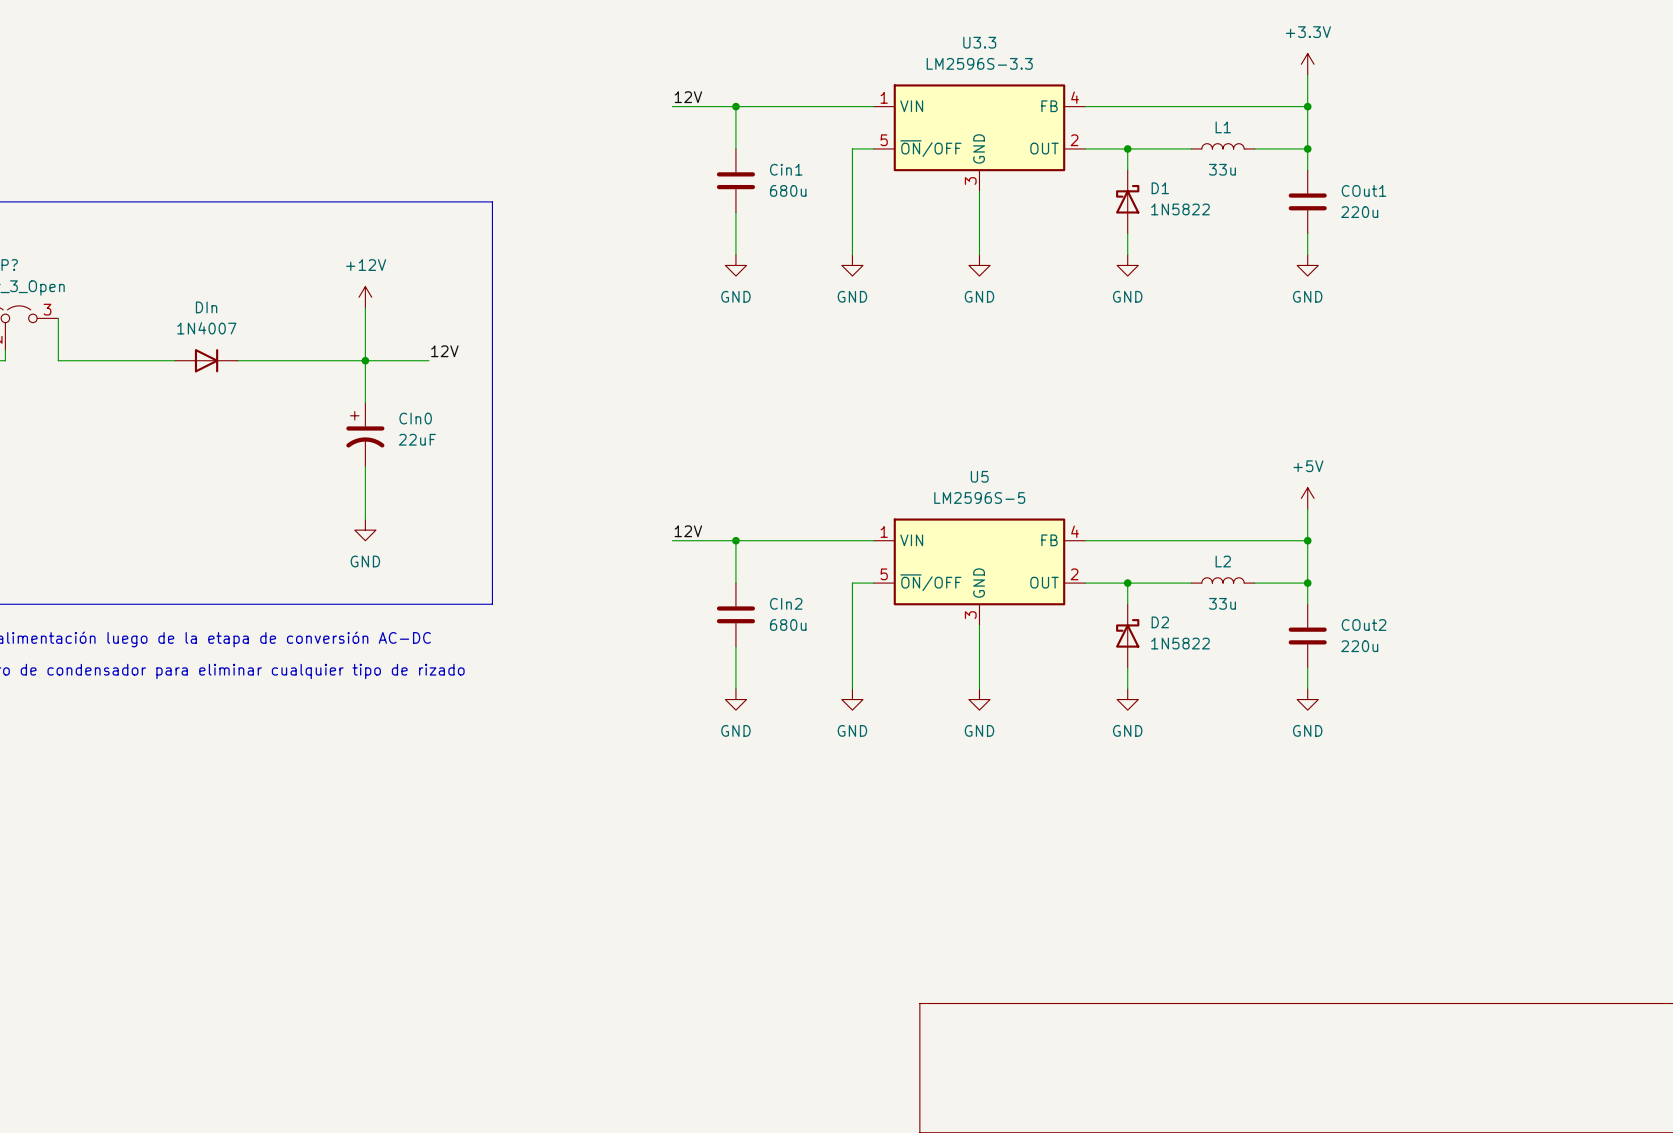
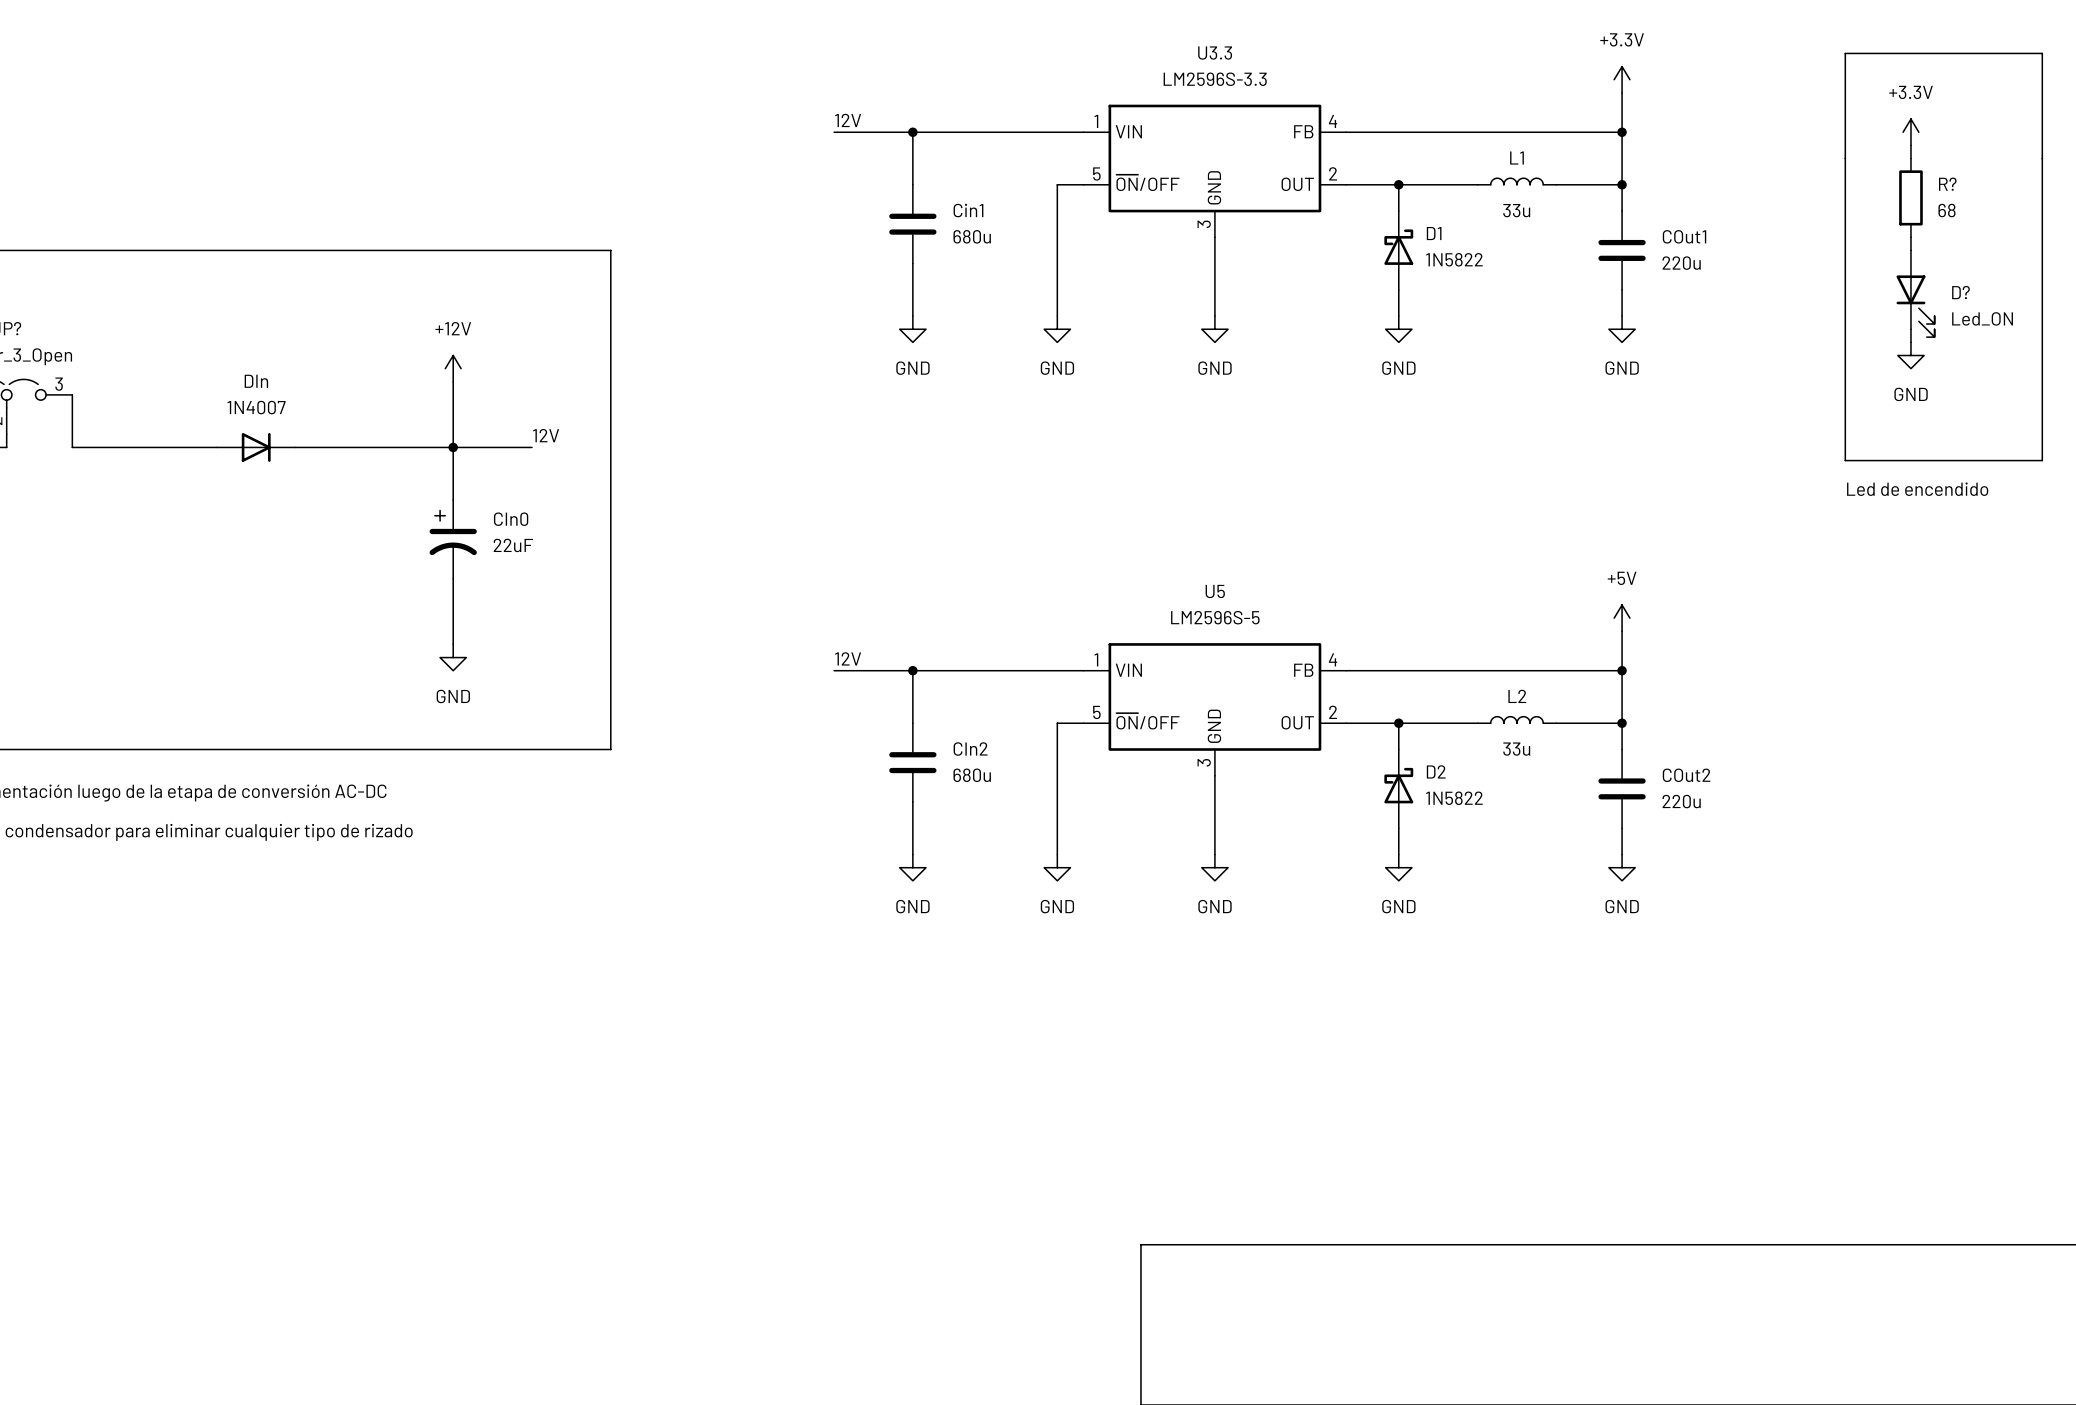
line: none -> (1845, 53) (1845, 460) (2042, 460) (2042, 53) (1845, 53)
power symbol: none -> +3.3V (1910, 132)
wire: none -> (1910, 145) (1910, 158)
R?: none -> 68 (1910, 197)
wire: none -> (1910, 237) (1910, 250)
D?: none -> Led_ON (1915, 293)
wire: none -> (1910, 329) (1910, 342)
power symbol: none -> GND (1910, 355)
text: none -> Led de encendido (1917, 489)

